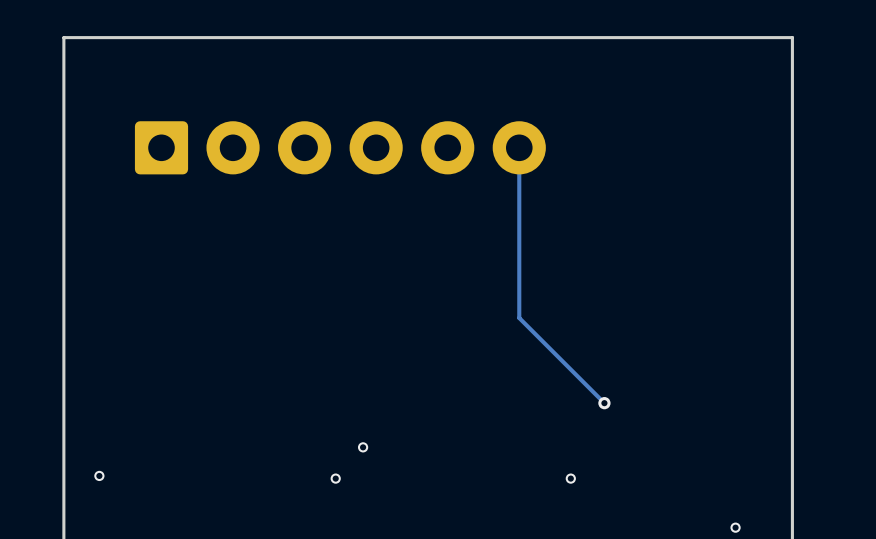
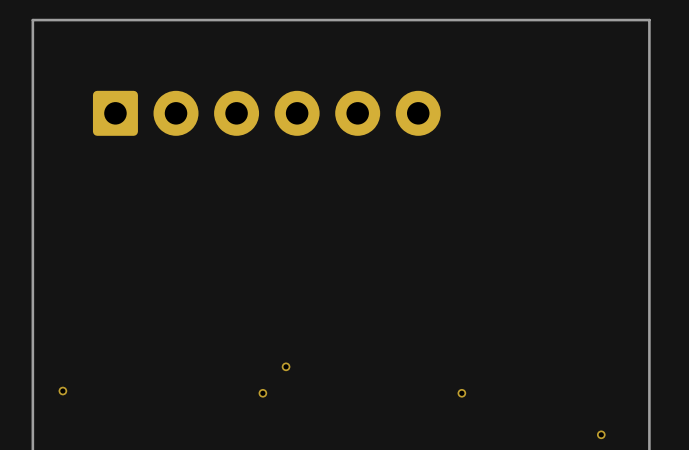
track: (519, 147) (519, 318) (604, 403) -> none
via: (604, 403) -> none

